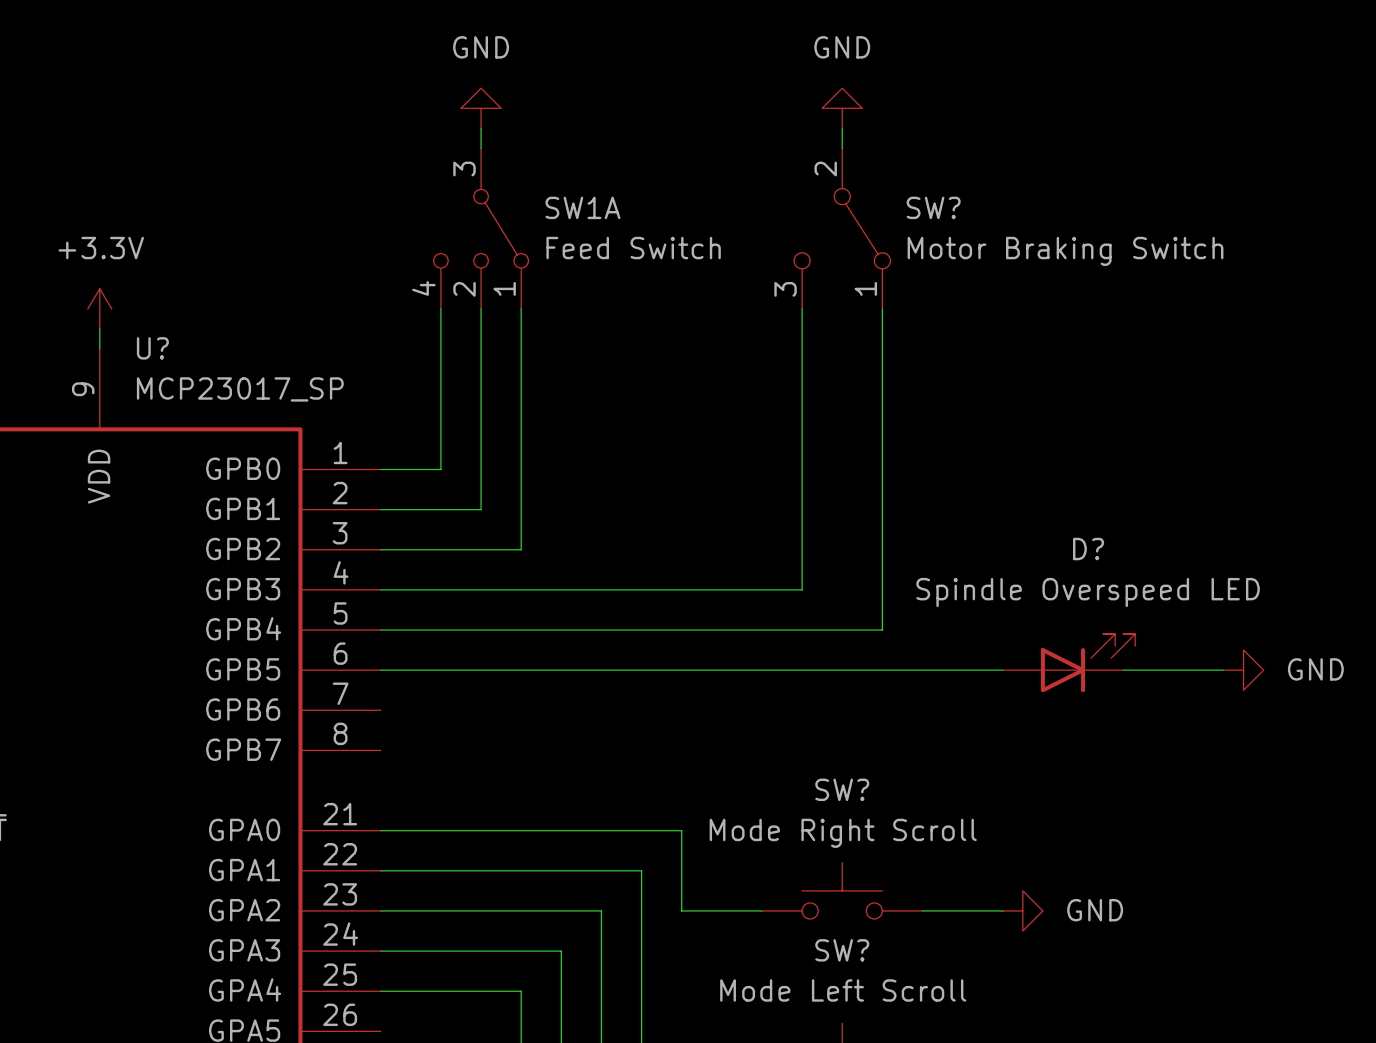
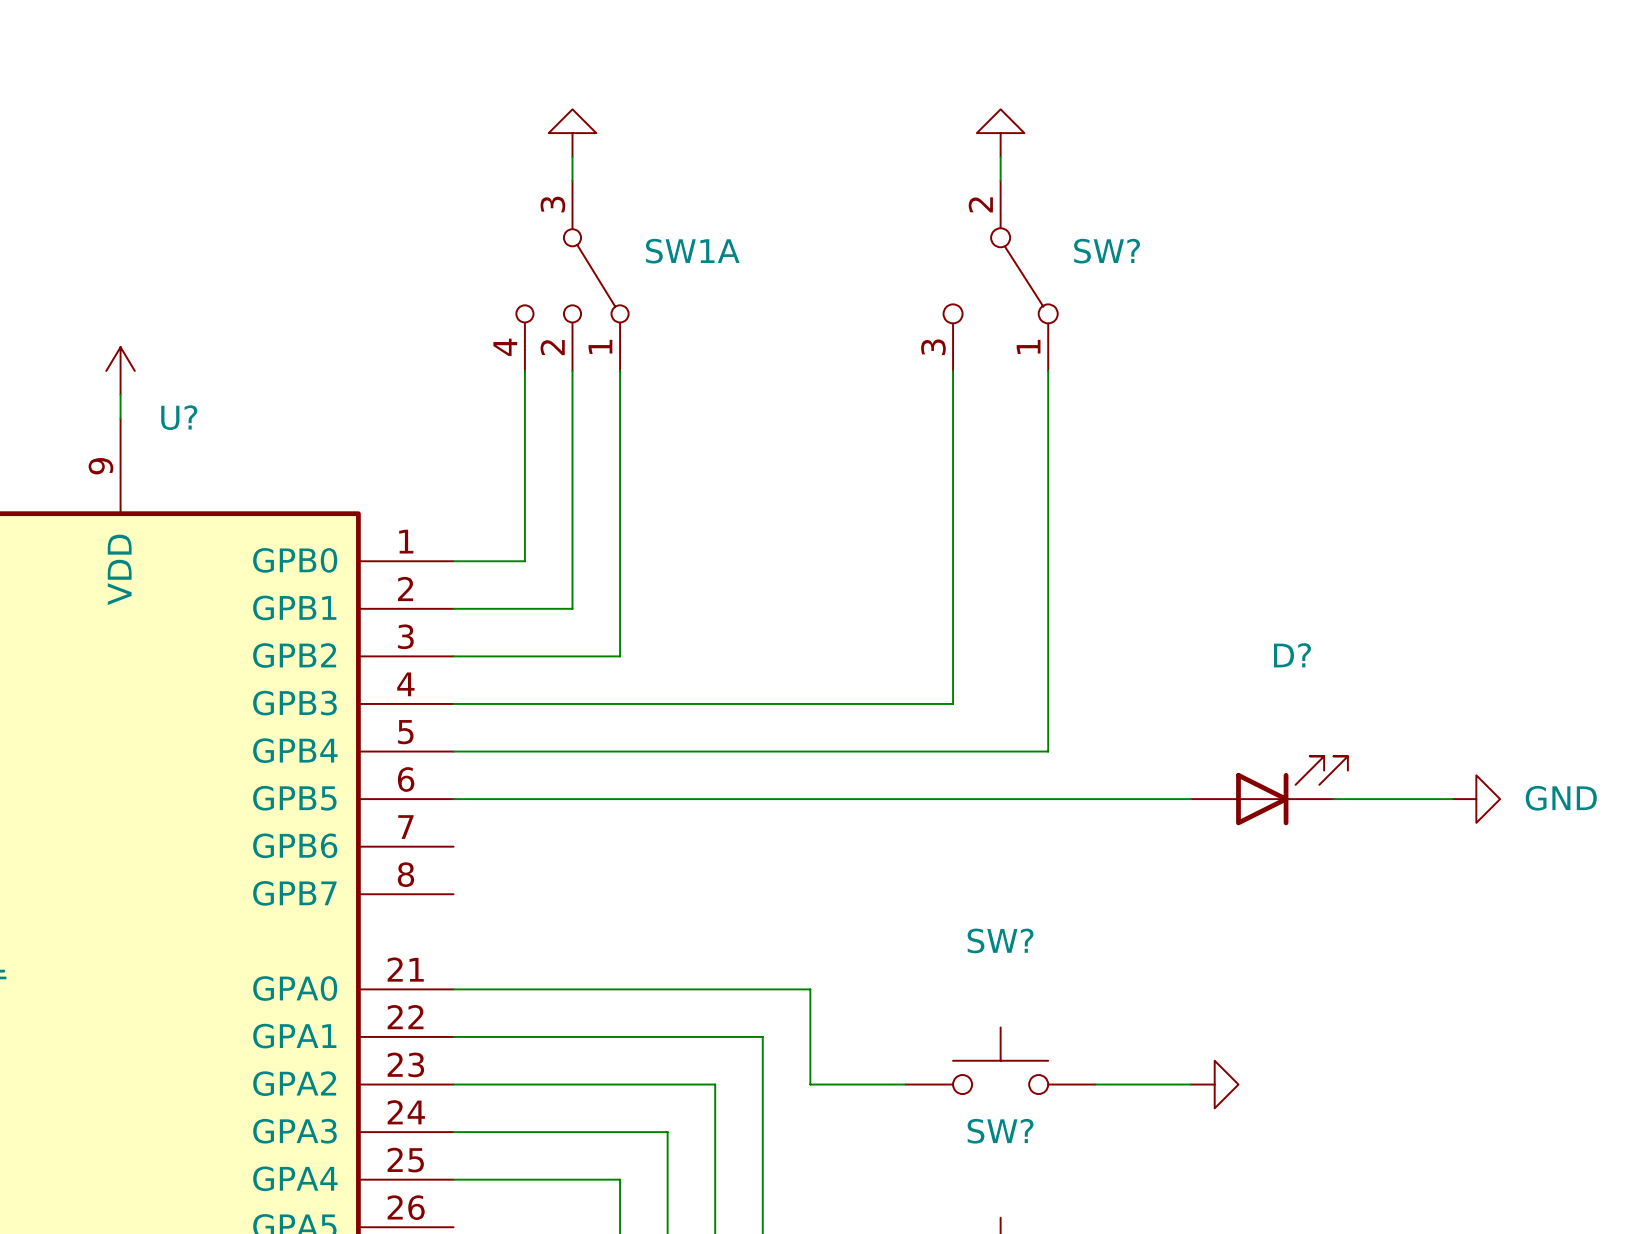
power symbol text: GND (481, 47) -> none
power symbol text: GND (842, 47) -> none
power symbol text: +3.3V (101, 248) -> none
SW1A value: Feed Switch (633, 248) -> none
SW? value: Motor Braking Switch (1065, 251) -> none
U? value: MCP23017_SP (240, 389) -> none
D? value: Spindle Overspeed LED (1088, 592) -> none
SW? value: Mode Right Scroll (843, 833) -> none
power symbol text: GND (1095, 910) -> none
SW? value: Mode Left Scroll (843, 990) -> none

